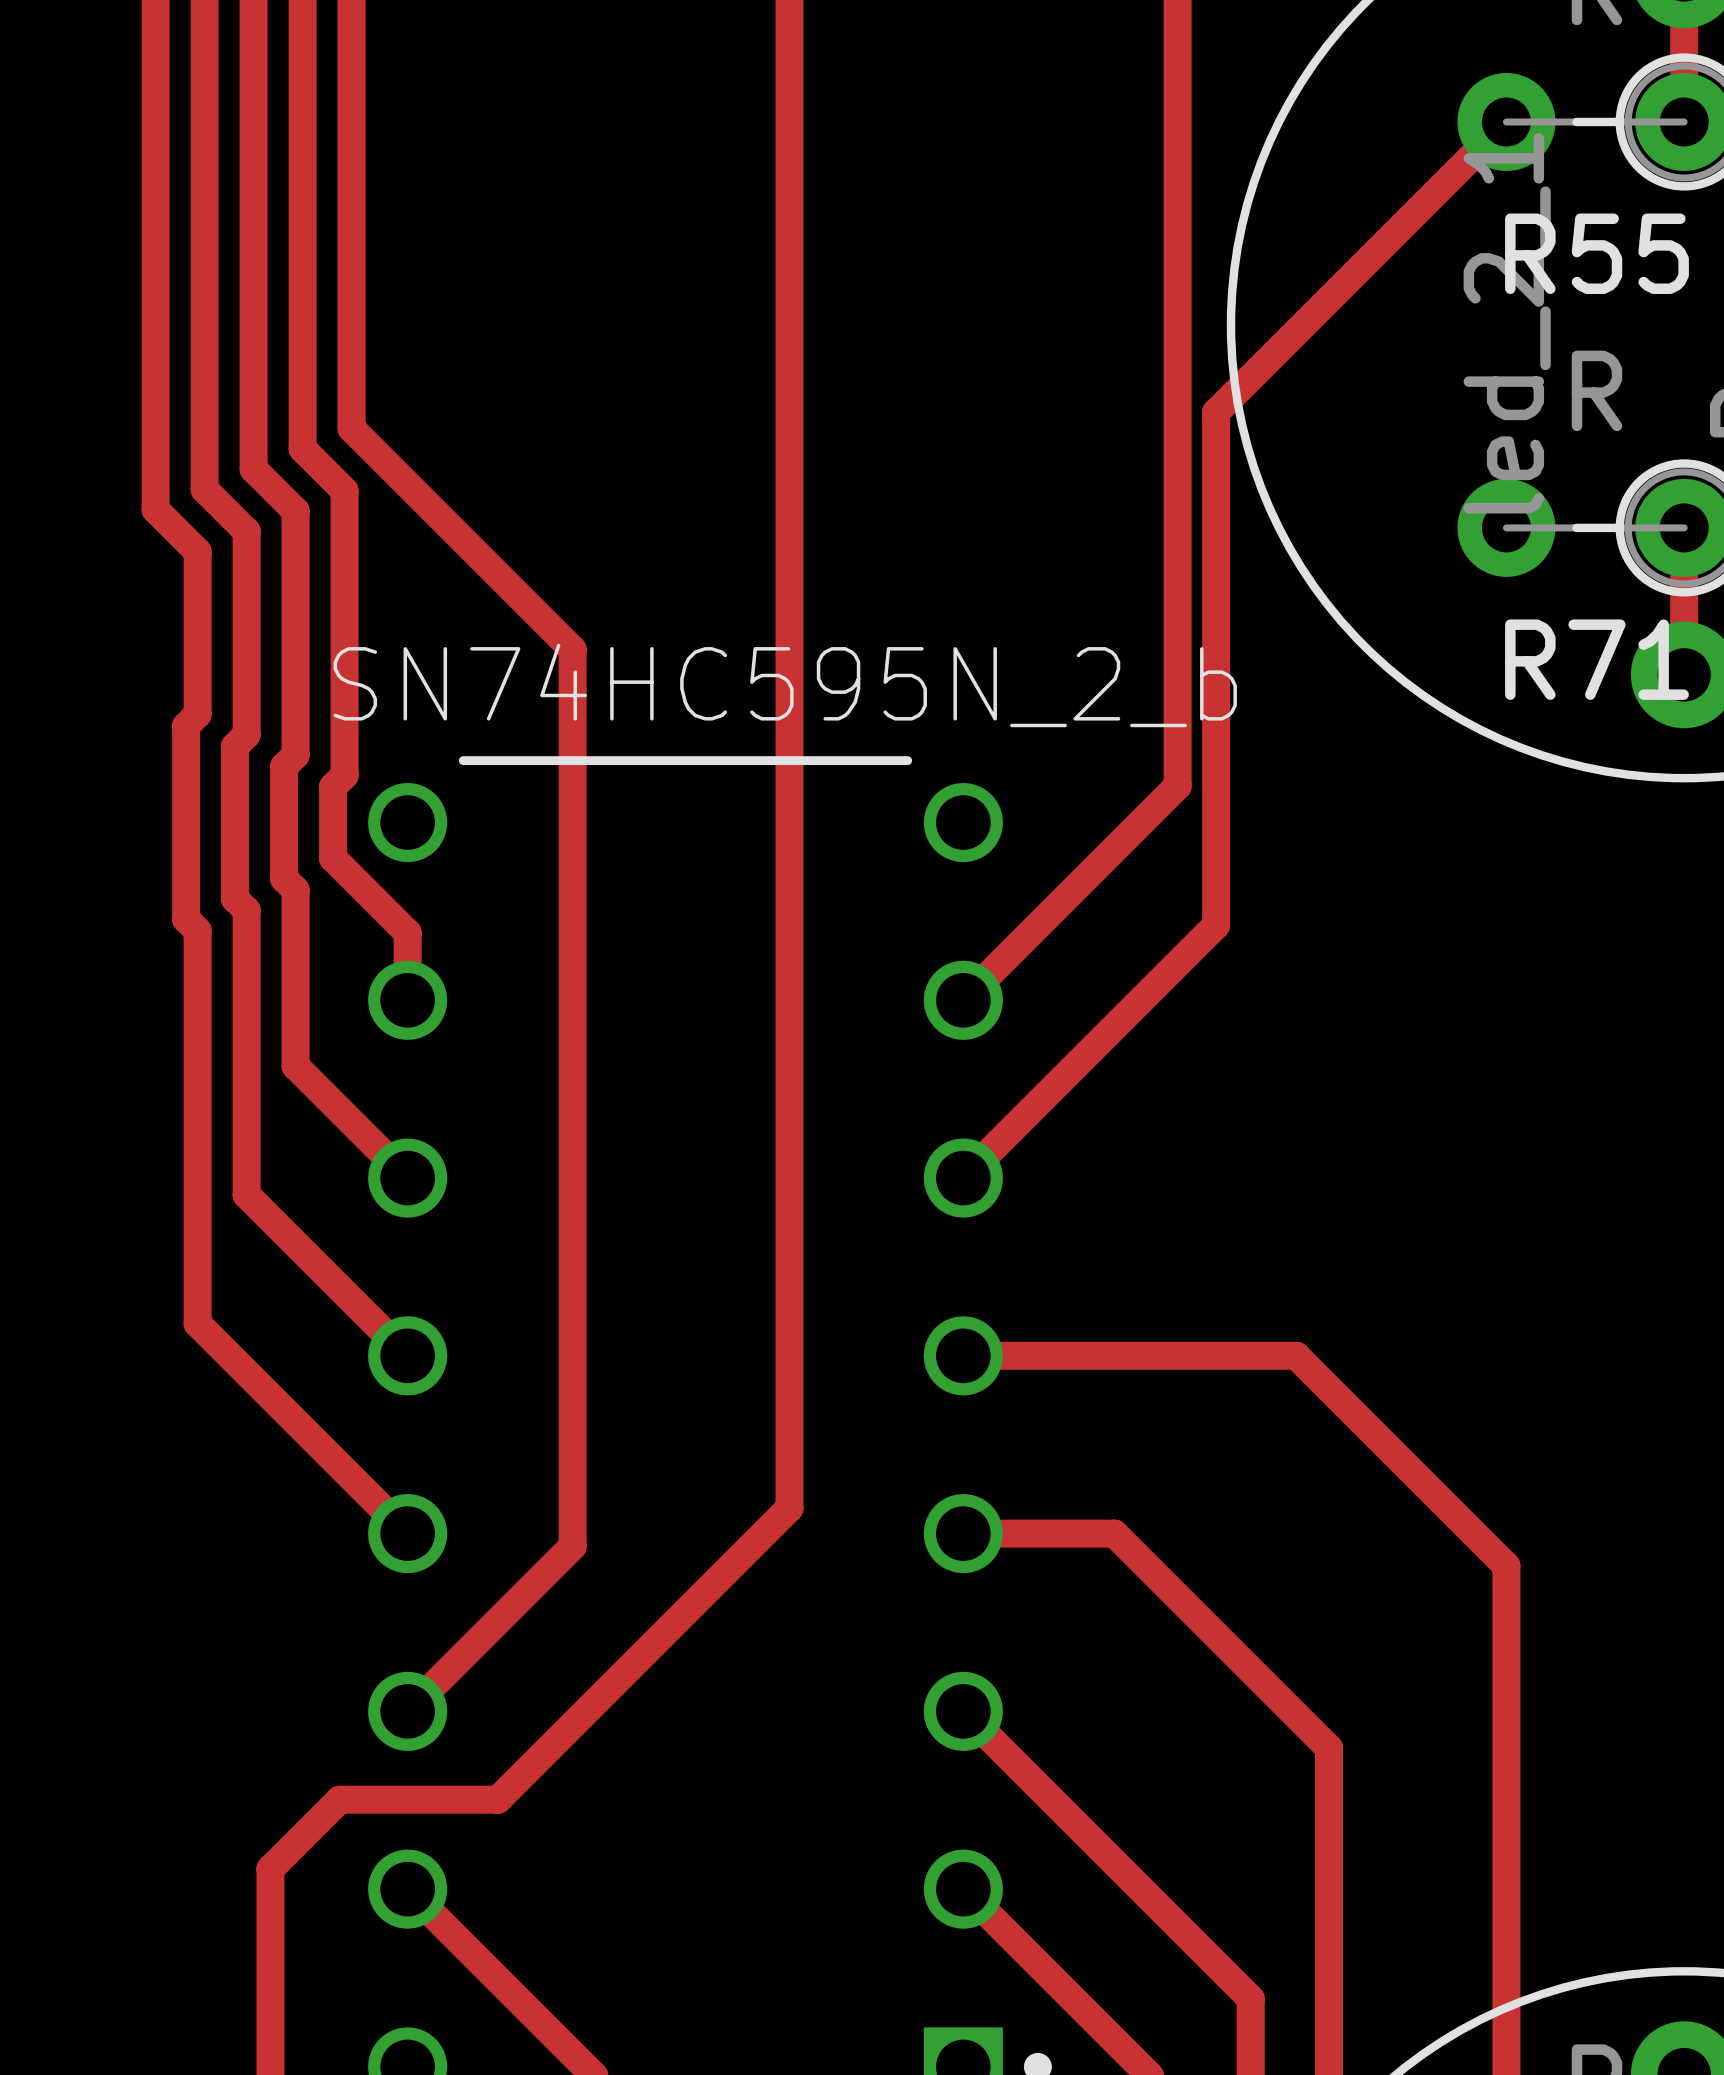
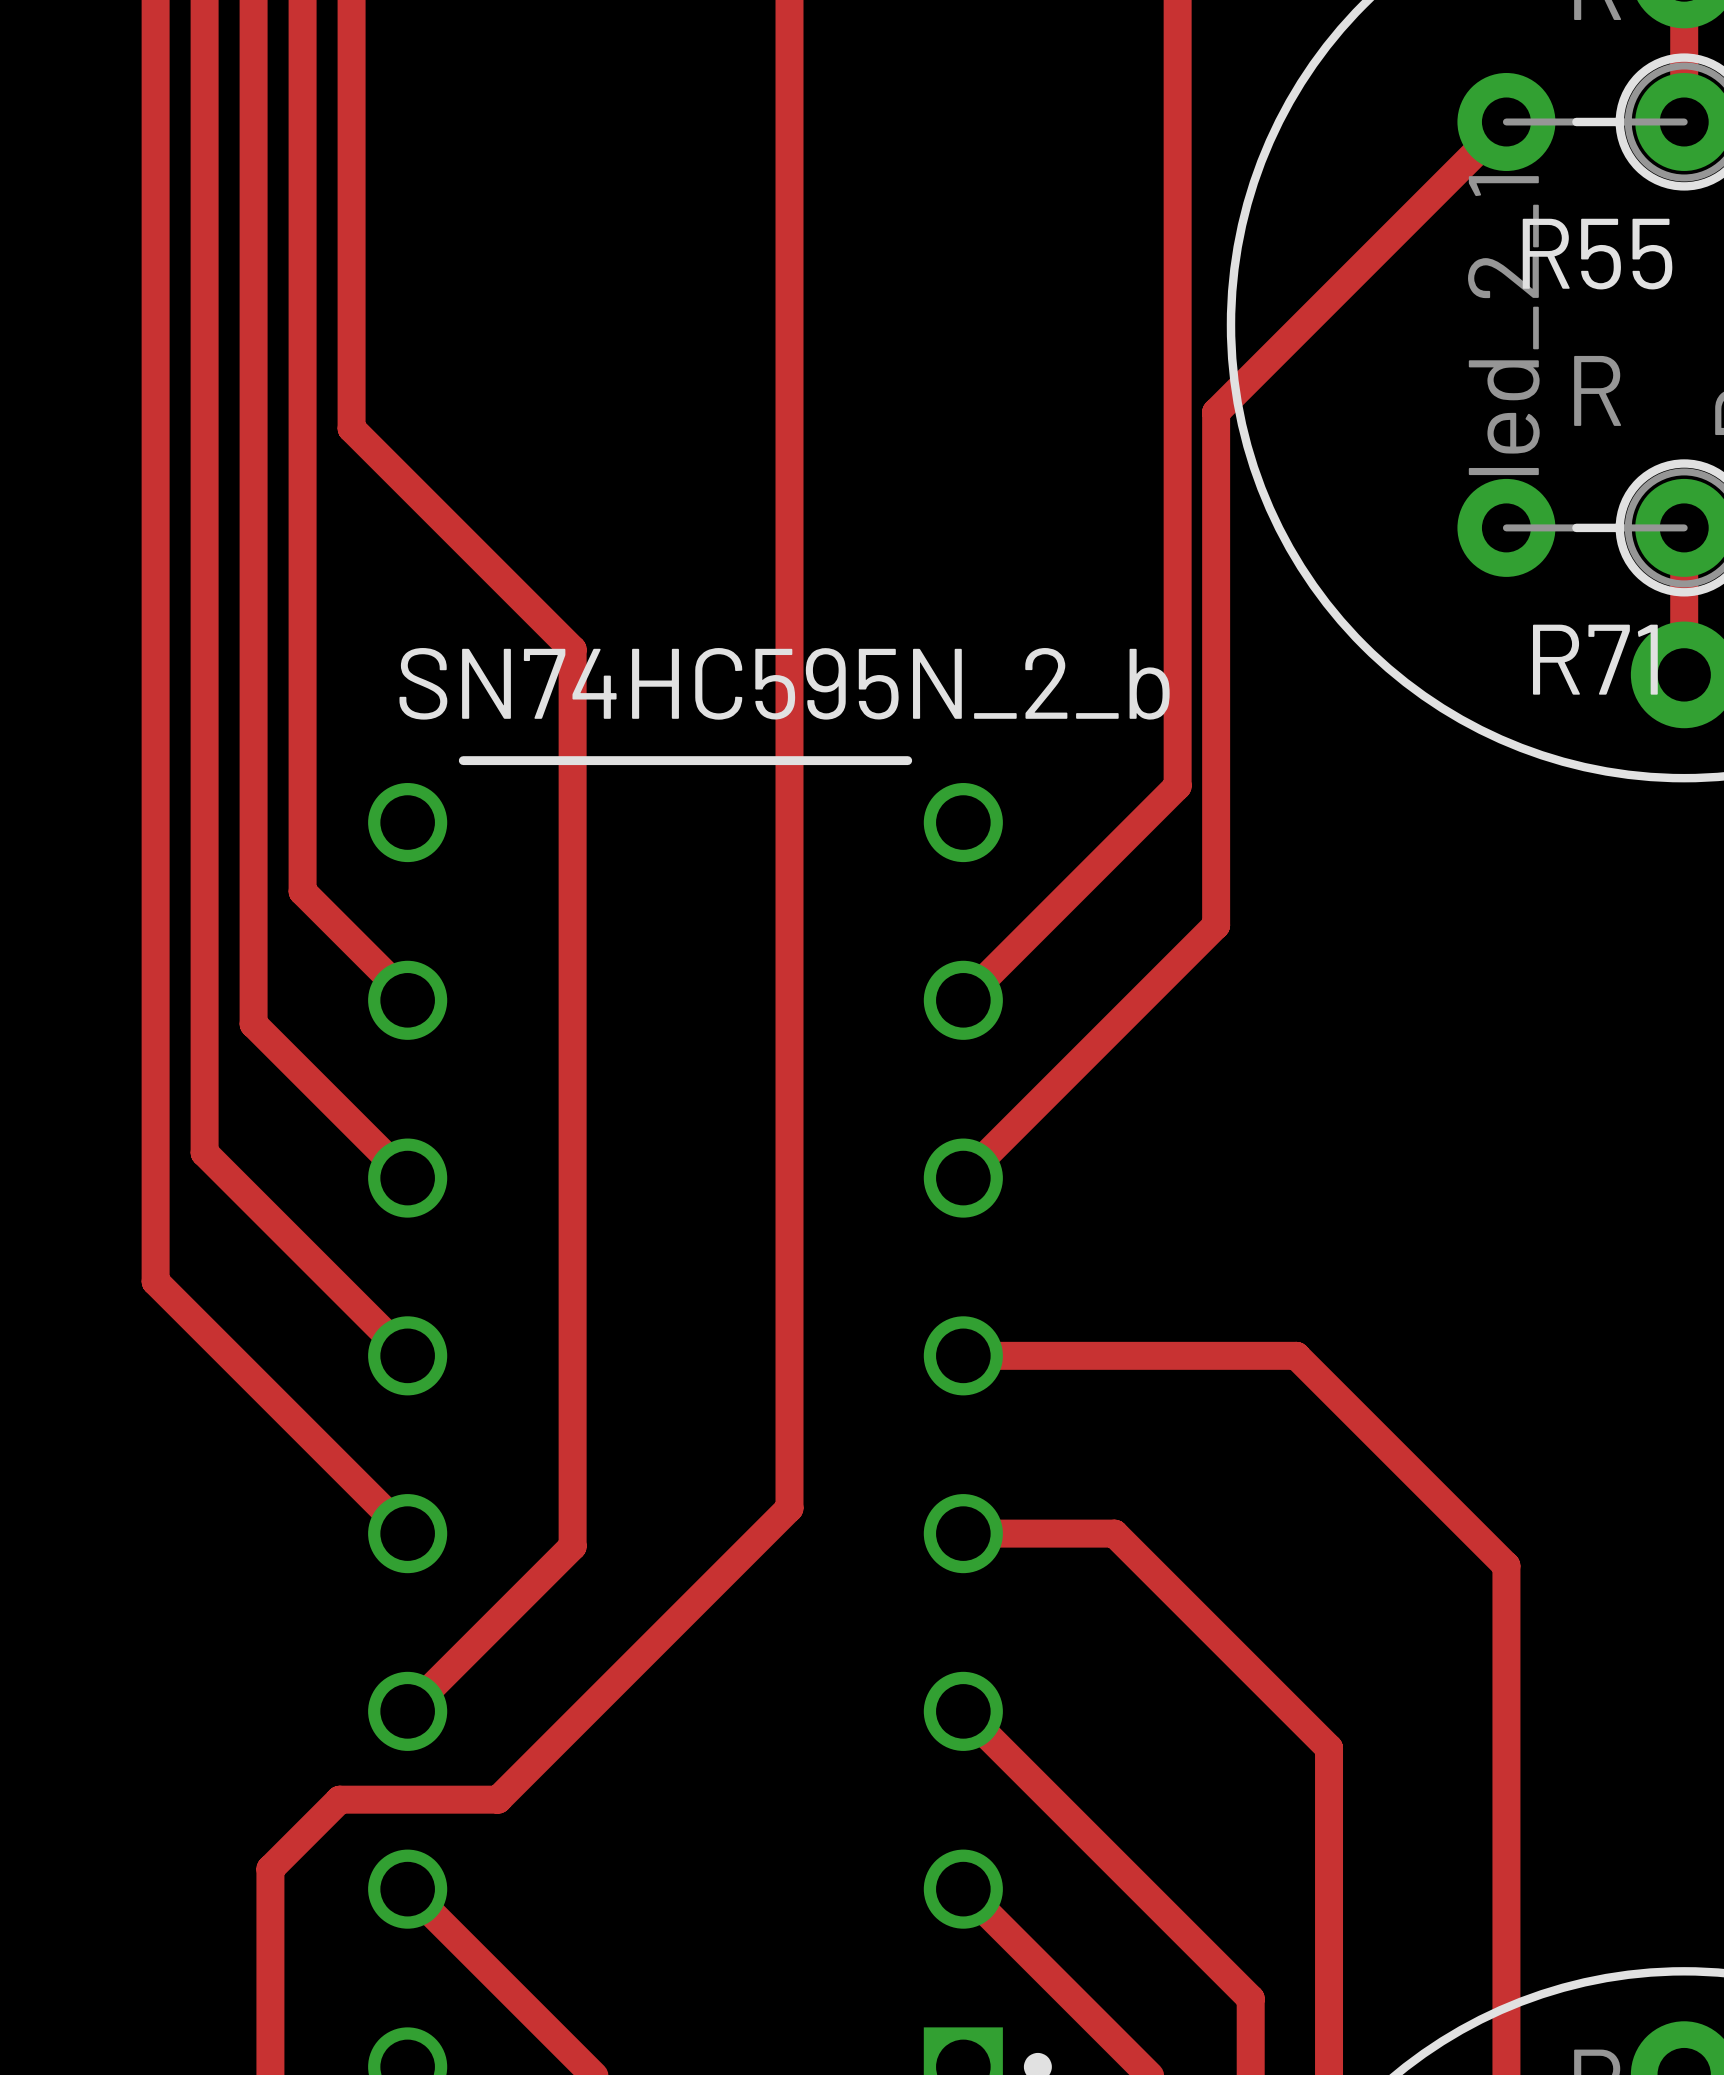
track: (302, 448) (344, 490) (344, 775) (333, 786) (333, 858) (407, 932) (407, 996) -> (302, 448) (302, 891) (407, 996)
track: (253, 469) (295, 511) (295, 755) (284, 766) (284, 878) (295, 890) (295, 1066) -> (253, 469) (253, 1024) (295, 1066)
track: (204, 489) (246, 531) (246, 734) (235, 746) (235, 898) (246, 910) (246, 1194) -> (204, 489) (204, 1152) (246, 1194)
track: (155, 509) (197, 551) (197, 714) (186, 725) (186, 919) (197, 930) (197, 1323) -> (155, 509) (155, 1281) (197, 1323)

